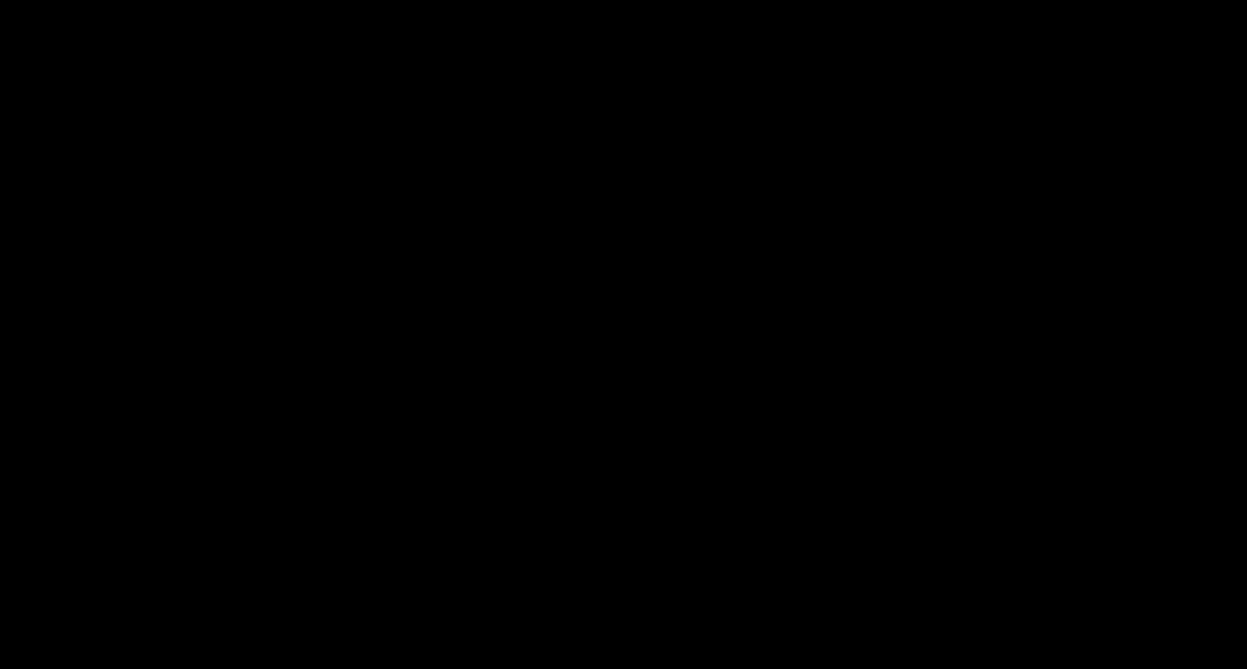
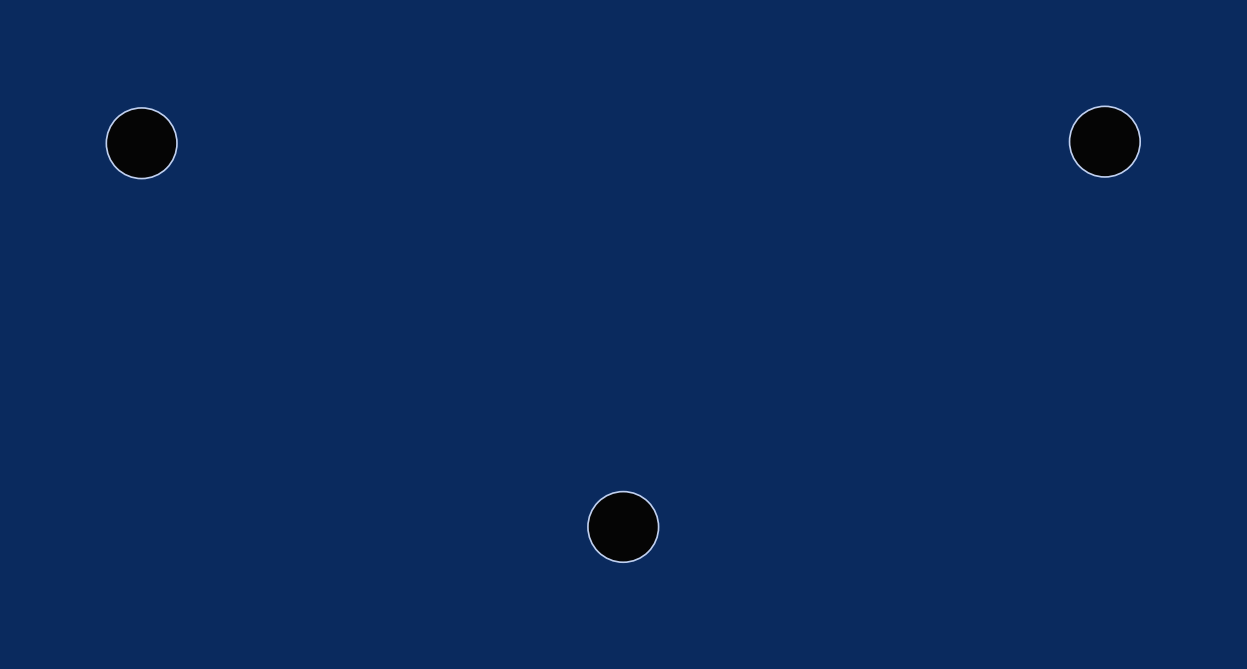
part: none -> (1104, 141)
part: none -> (141, 143)
part: none -> (623, 526)

